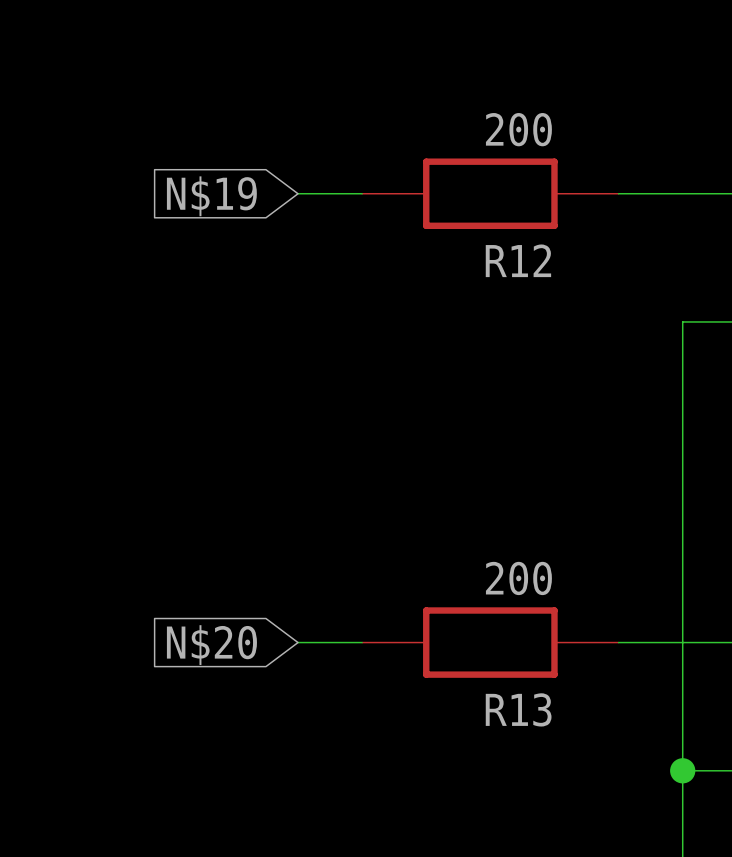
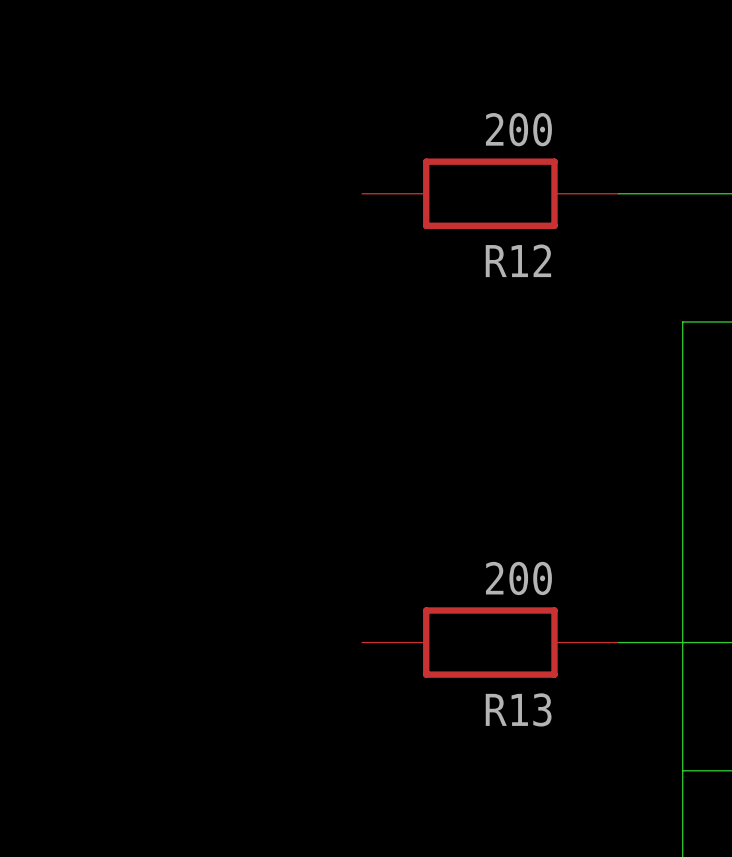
wire: (298, 193) (362, 193) -> none
global label: N$19 (211, 196) -> none
wire: (298, 642) (362, 642) -> none
global label: N$20 (211, 645) -> none
junction: (682, 770) -> none

